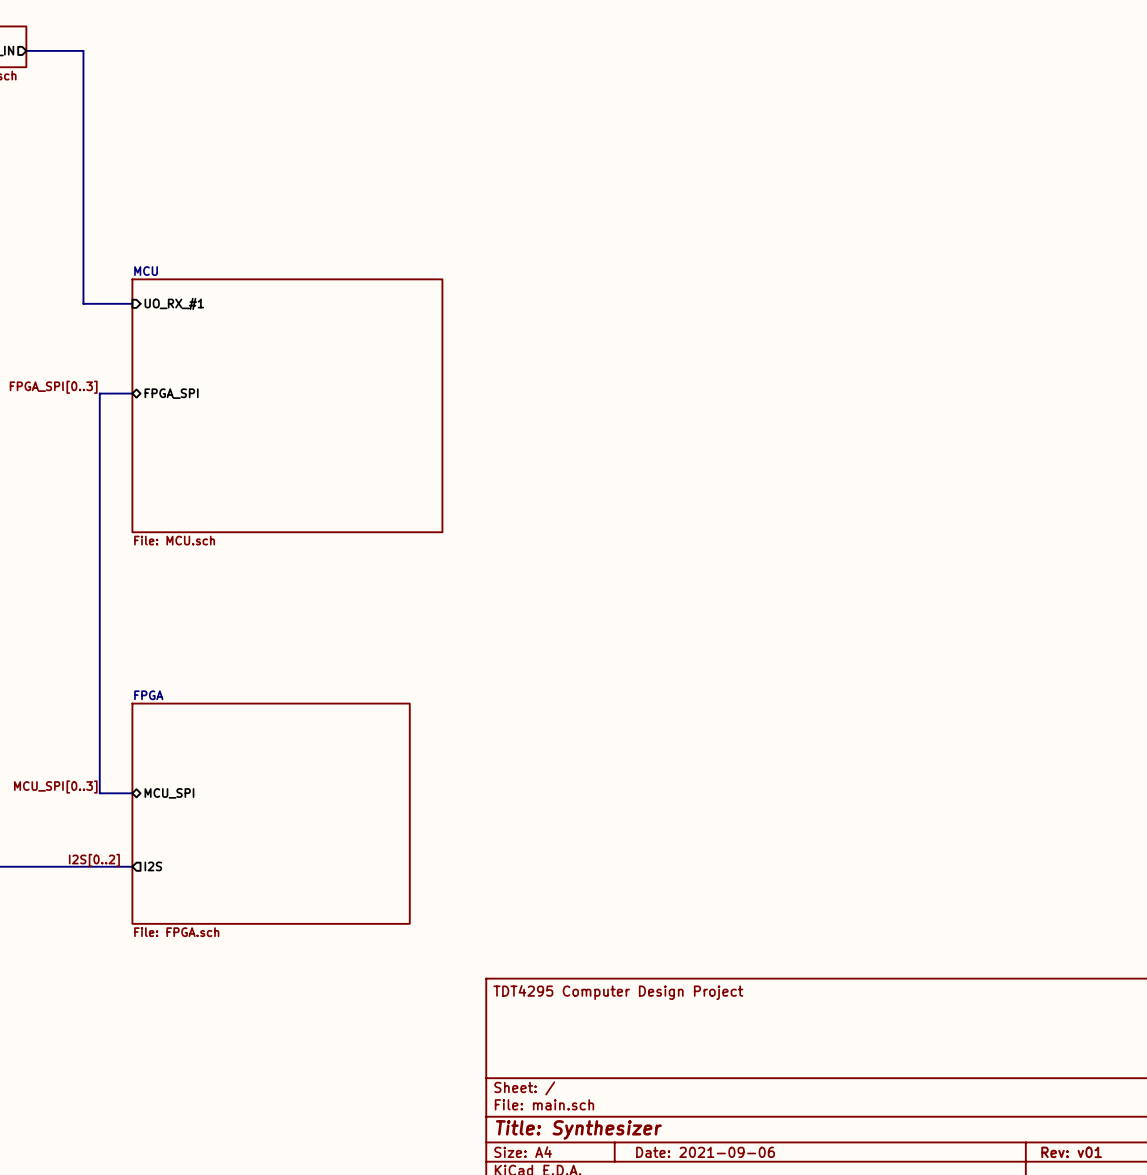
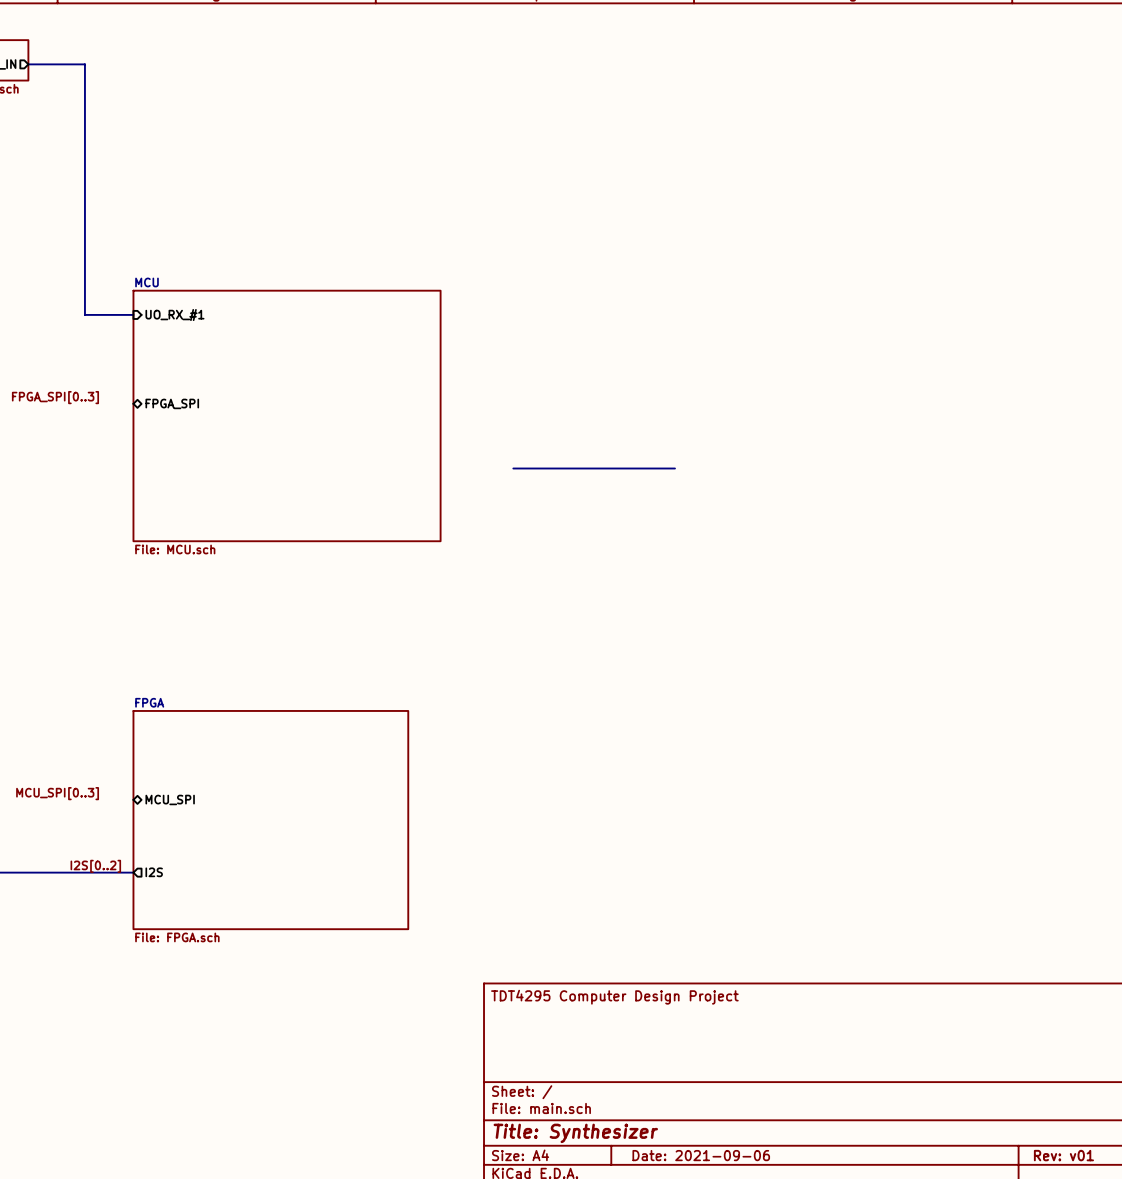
bus: (132, 393) (99, 393) (99, 793) (132, 793) -> none
bus: none -> (513, 468) (674, 468)

